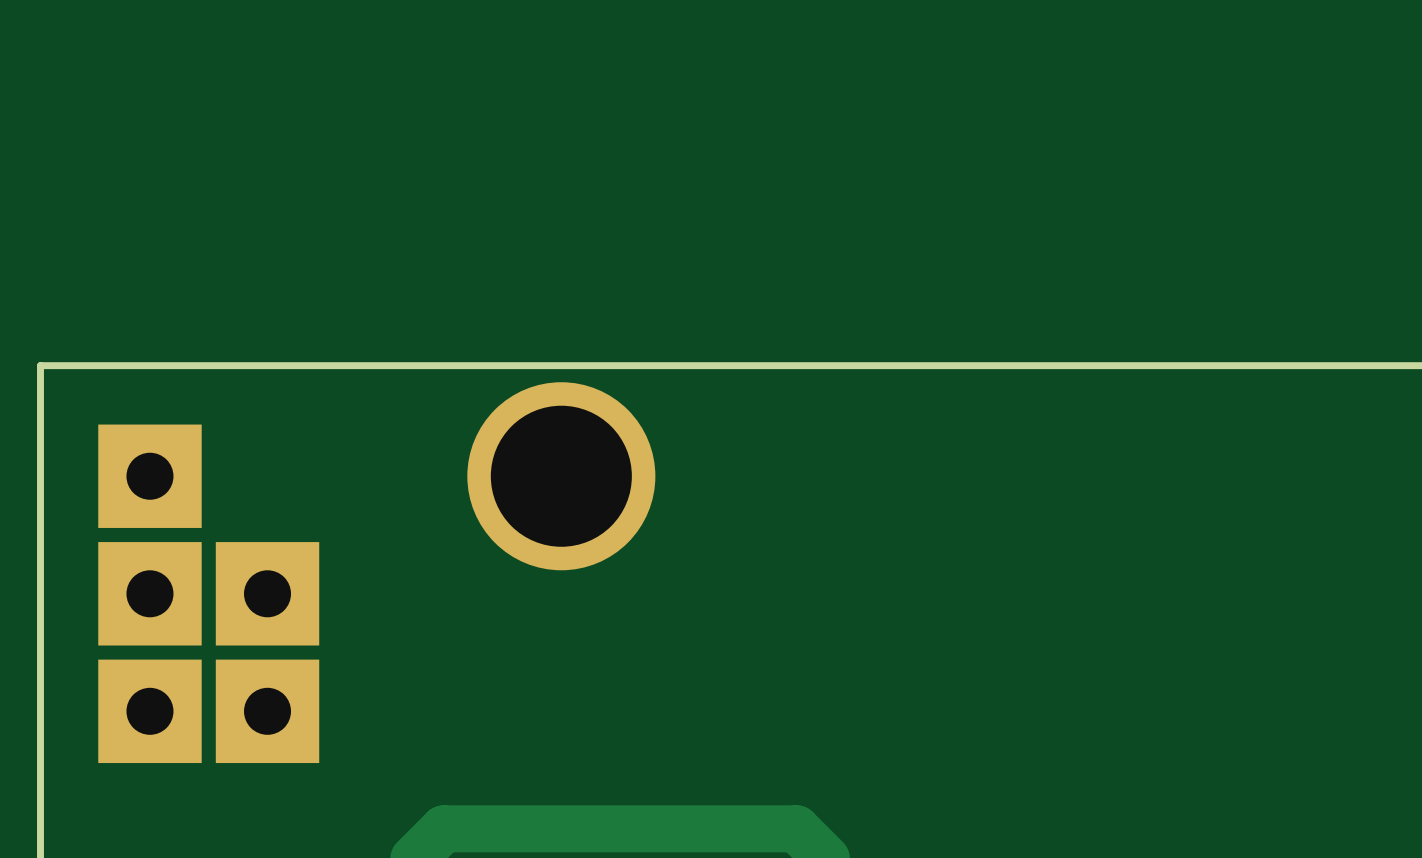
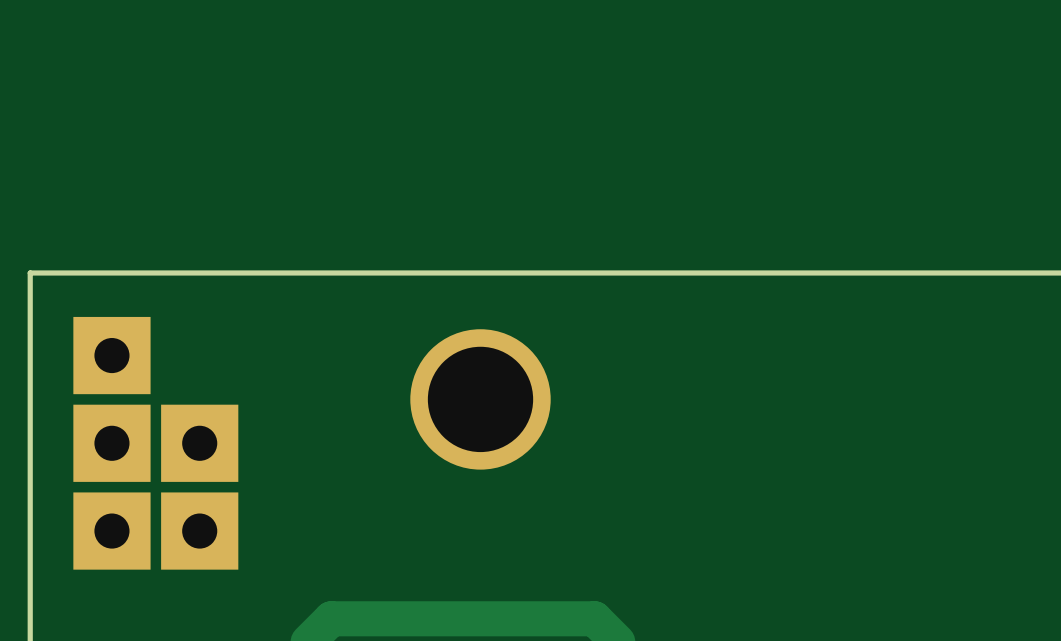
part position: (561, 476) -> (480, 399)

